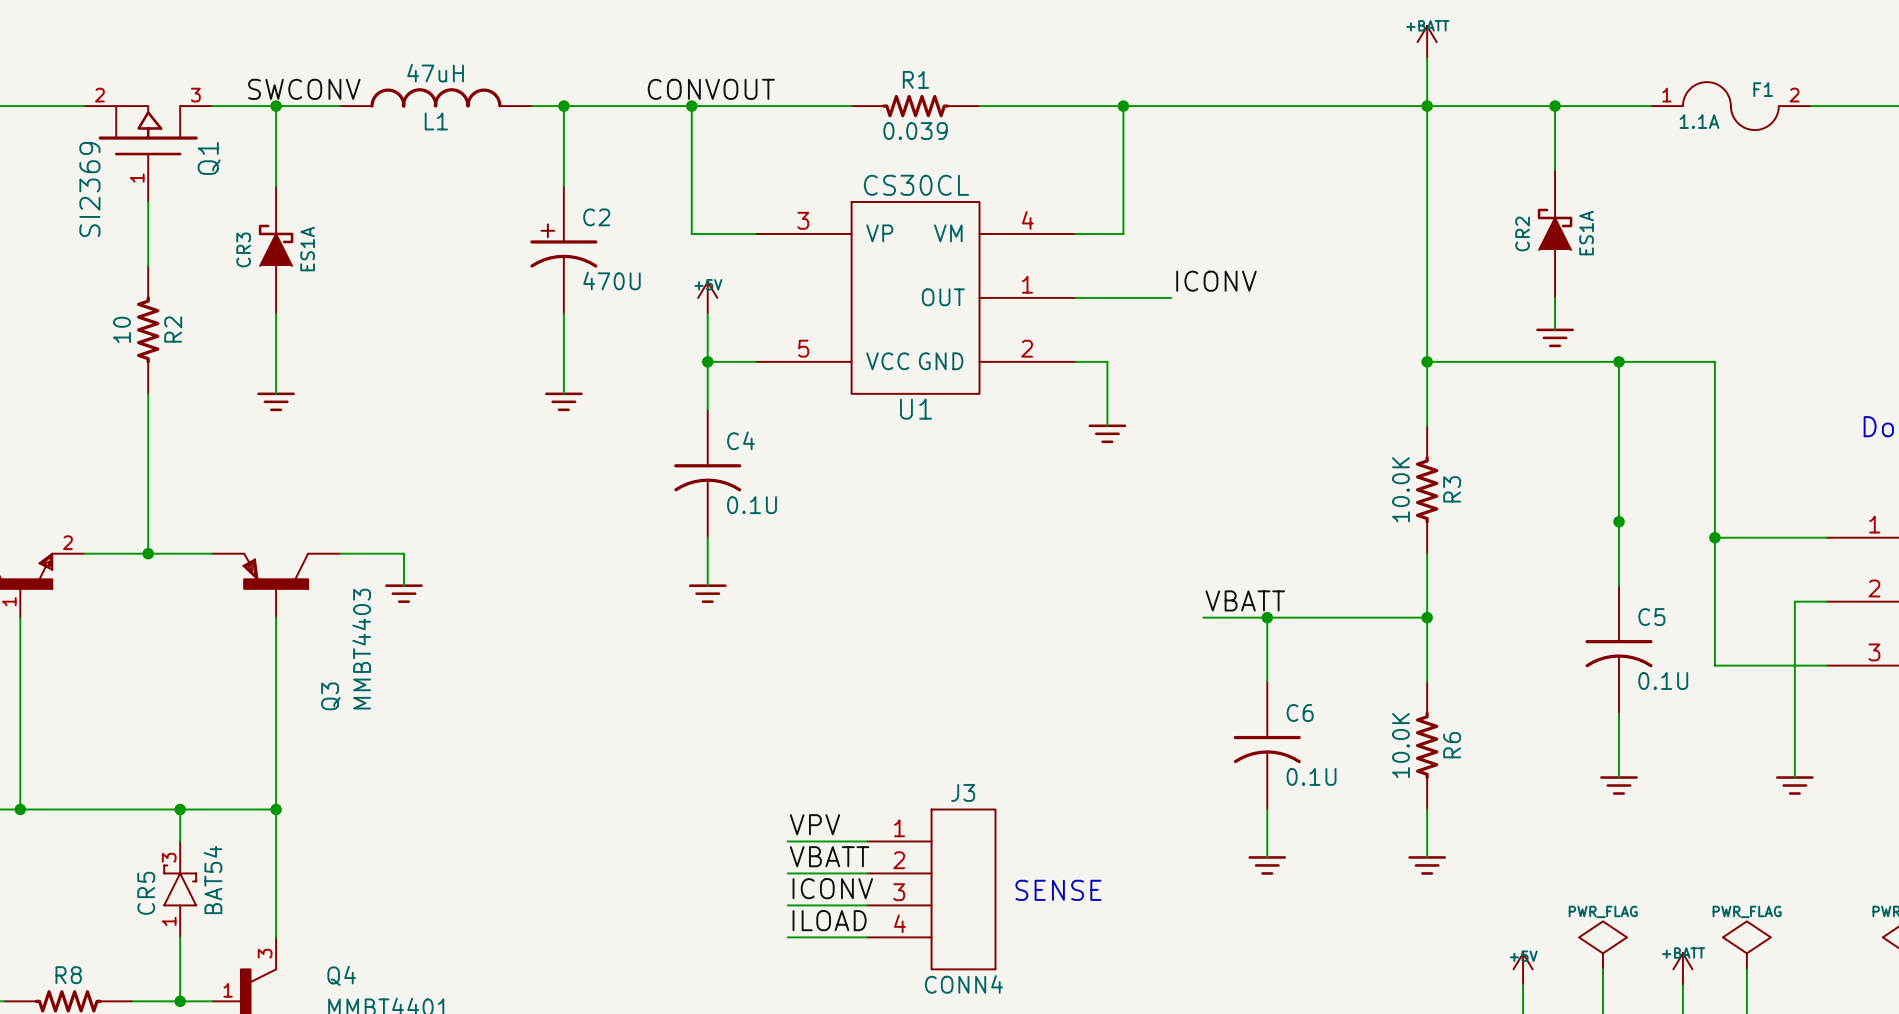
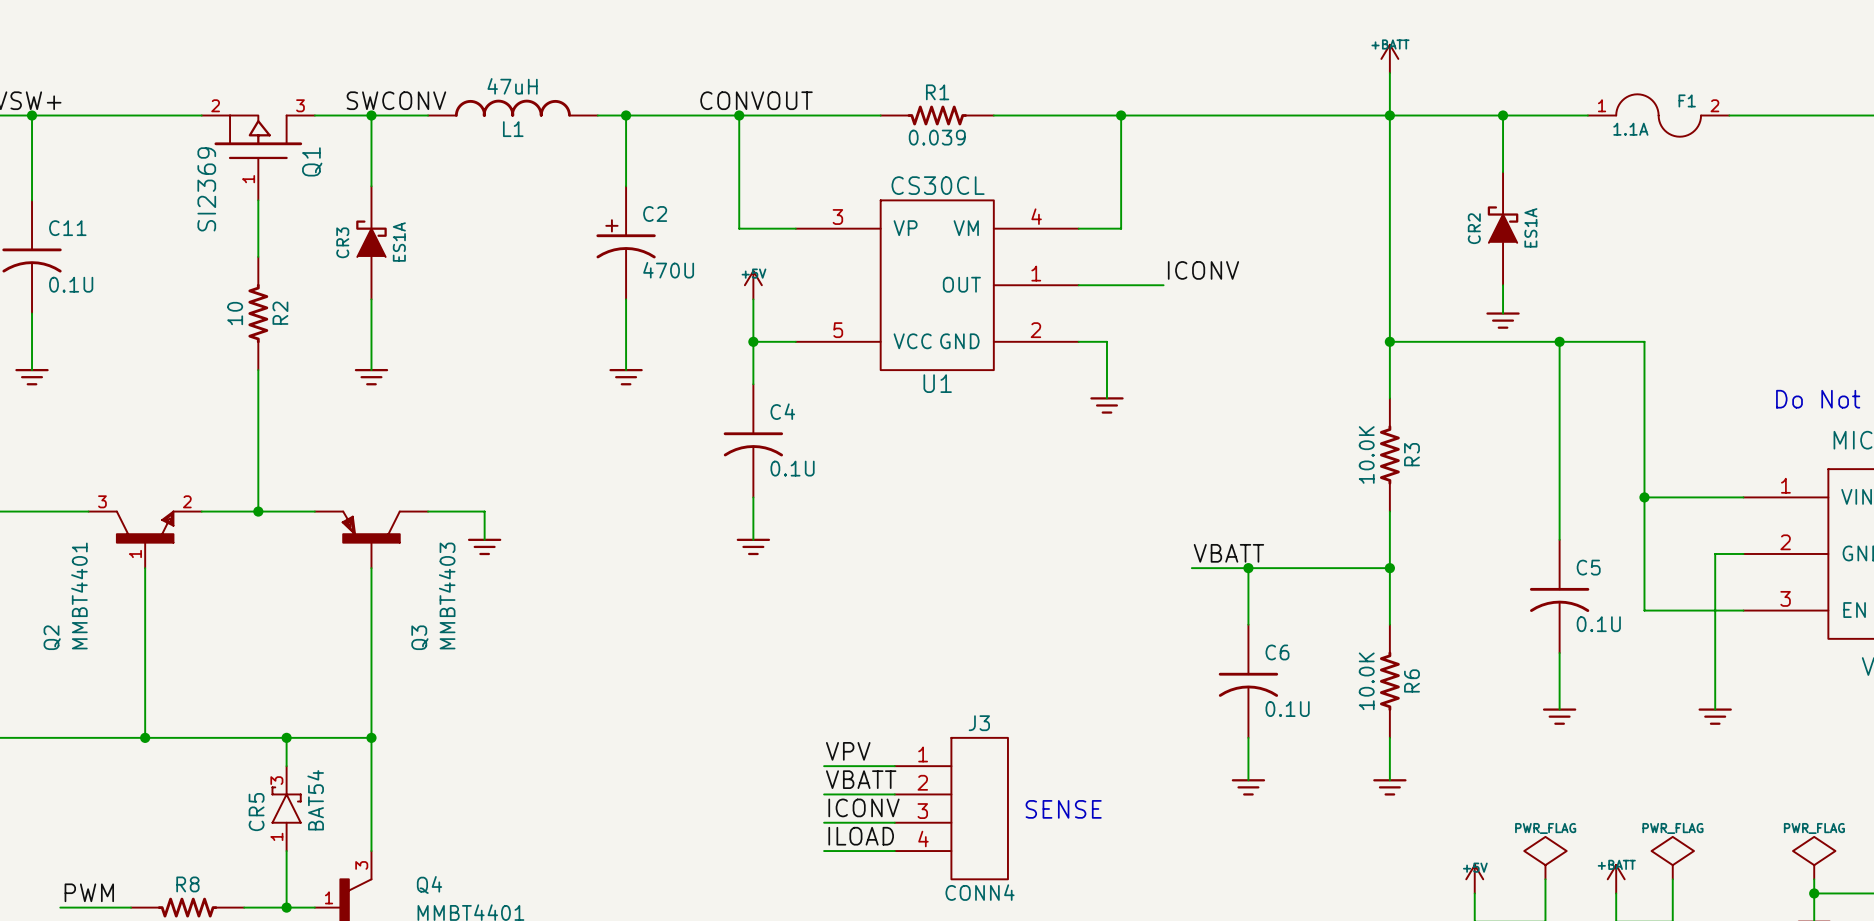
junction: (1618, 521) -> none

